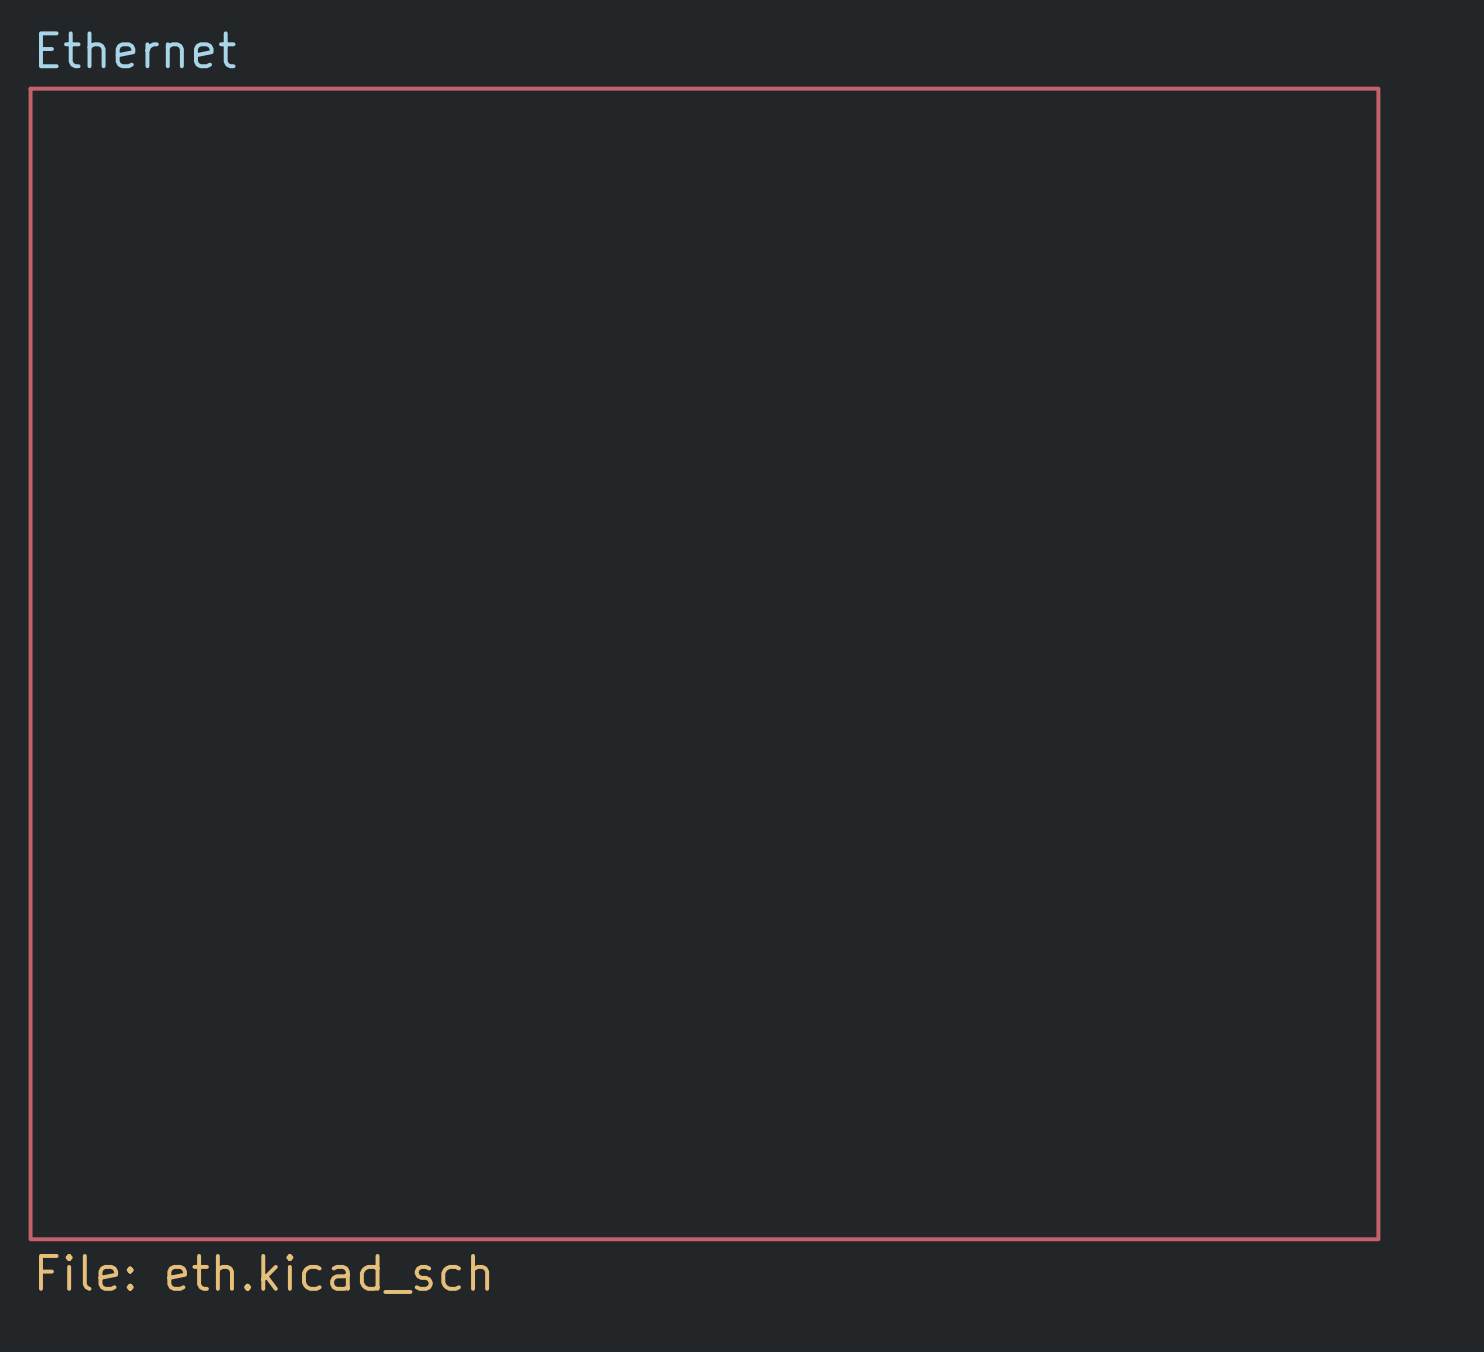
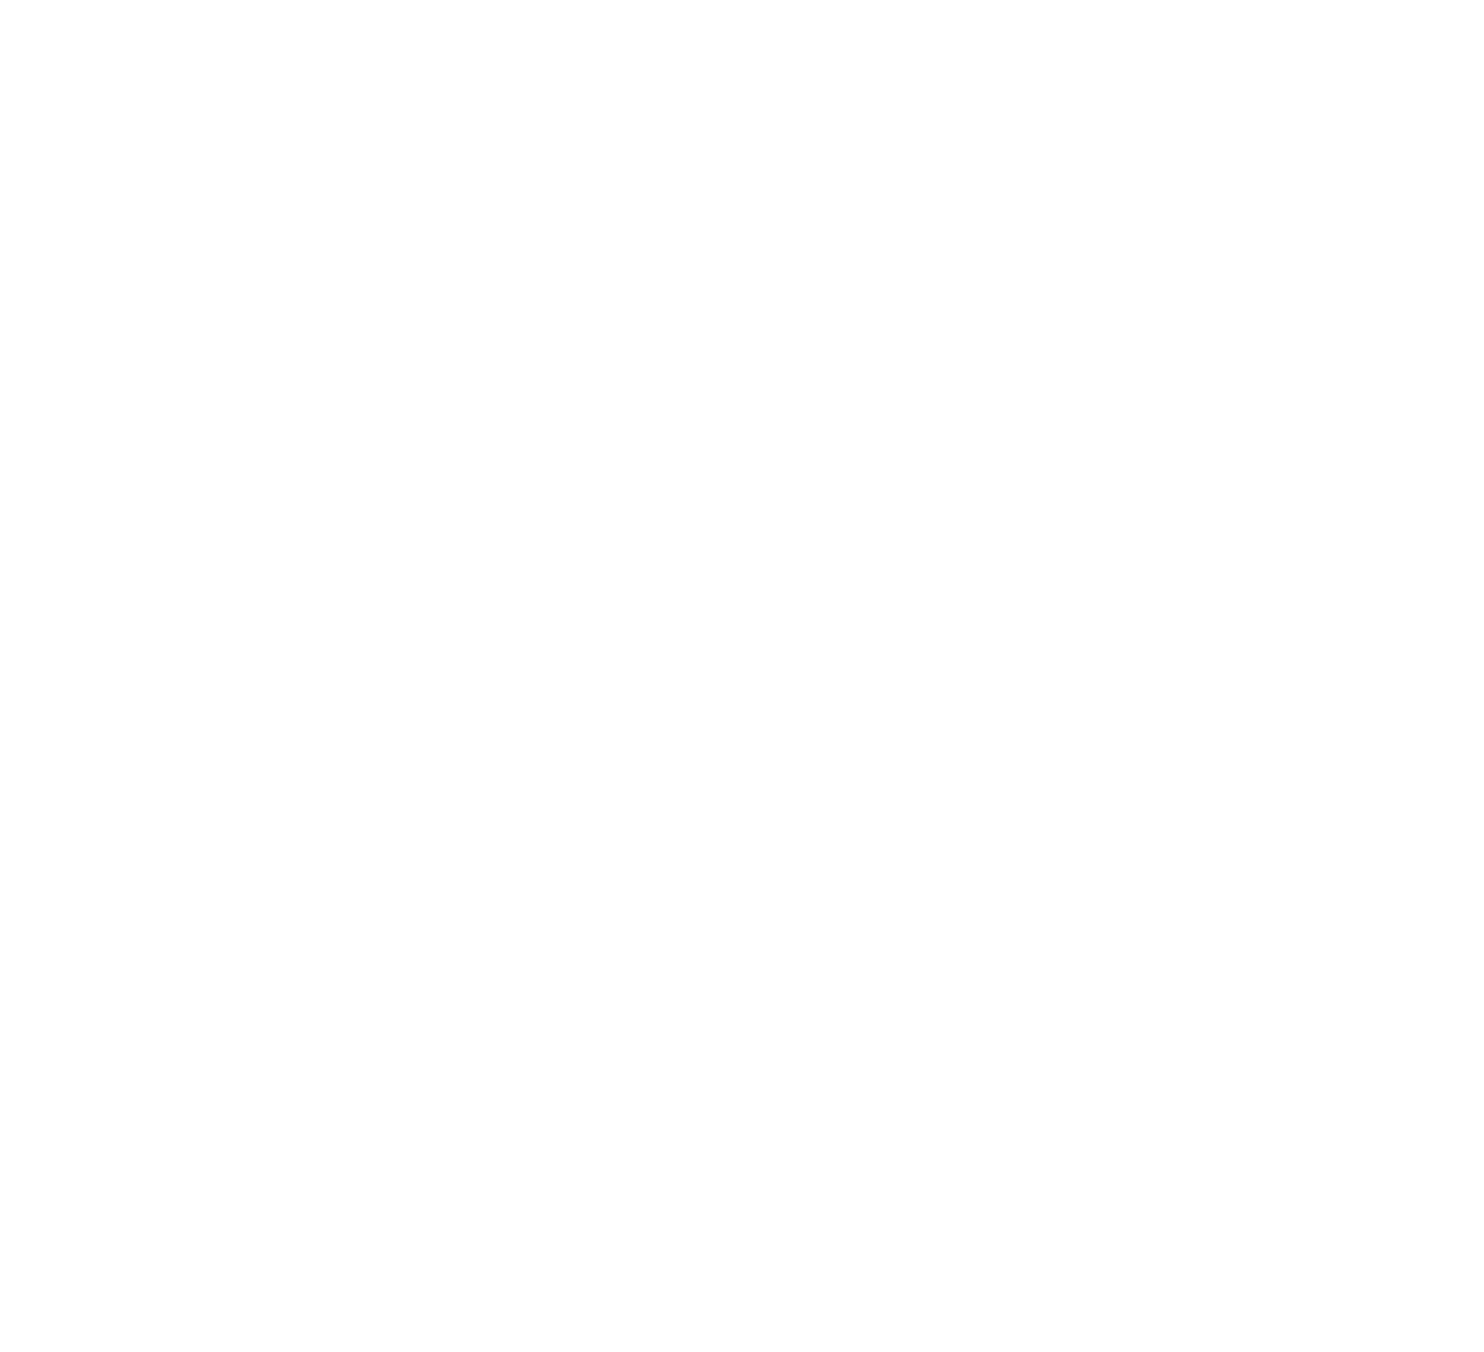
sheet Ethernet: File: eth.kicad_sch (704, 663) -> none

